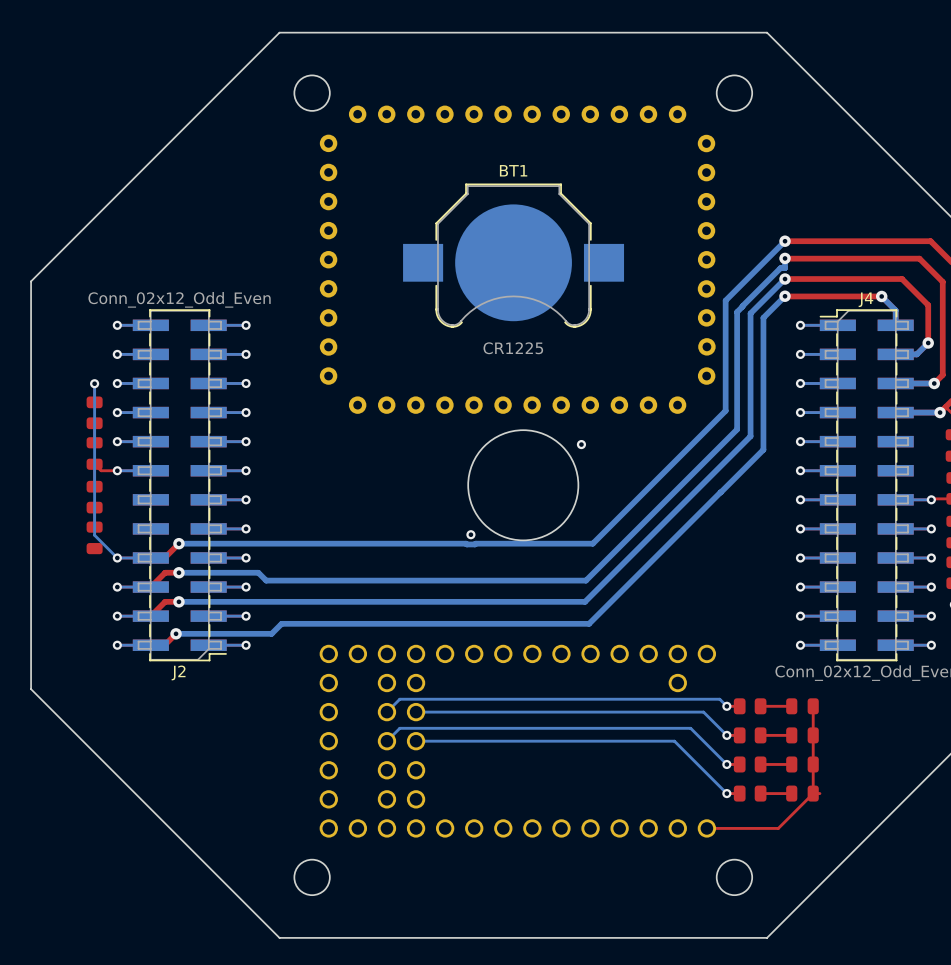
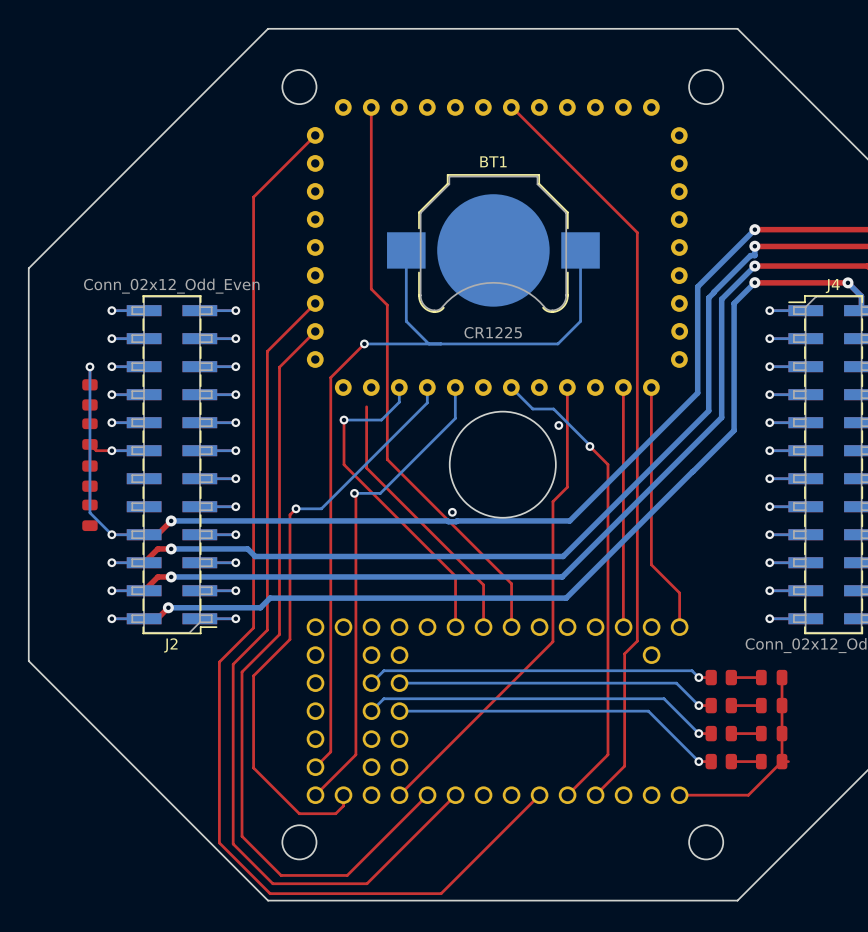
top track: none -> (371, 107) (371, 289) (387, 305) (387, 459) (511, 583) (511, 627)
top track: none -> (511, 107) (637, 232) (637, 641) (624, 653) (624, 766) (595, 795)
top track: none -> (315, 135) (253, 197) (253, 627) (219, 662) (219, 842) (270, 893) (441, 893) (539, 795)
bottom track: none -> (406, 250) (406, 321) (428, 343)
bottom track: none -> (580, 250) (580, 321) (557, 343) (364, 343)
top track: none -> (315, 303) (267, 351) (267, 630) (233, 664) (233, 844) (272, 883) (367, 883) (455, 795)
top track: none -> (315, 331) (279, 367) (279, 634) (242, 672) (242, 836) (281, 875) (347, 875) (427, 795)
top track: none -> (364, 343) (330, 377) (330, 751) (315, 767)
via: none -> (364, 343)
bottom track: none -> (399, 387) (399, 402) (381, 420) (344, 420)
bottom track: none -> (427, 387) (427, 402) (321, 508) (296, 508)
bottom track: none -> (455, 387) (455, 418) (380, 493) (354, 493)
bottom track: none -> (511, 387) (532, 409) (553, 409) (589, 446)
top track: none -> (567, 387) (567, 487) (552, 501) (552, 641) (399, 795)
top track: none -> (623, 387) (623, 627)
top track: none -> (651, 387) (651, 564) (679, 593) (679, 627)
top track: none -> (366, 406) (366, 468) (483, 584) (483, 627)
top track: none -> (344, 420) (344, 464) (455, 576) (455, 627)
via: none -> (344, 420)
top track: none -> (589, 446) (607, 464) (607, 754) (567, 795)
via: none -> (589, 446)
top track: none -> (354, 493) (355, 754) (315, 795)
via: none -> (354, 493)
top track: none -> (296, 508) (289, 514) (289, 639) (253, 675) (253, 767) (299, 813) (335, 813) (343, 805) (343, 795)
via: none -> (296, 508)

